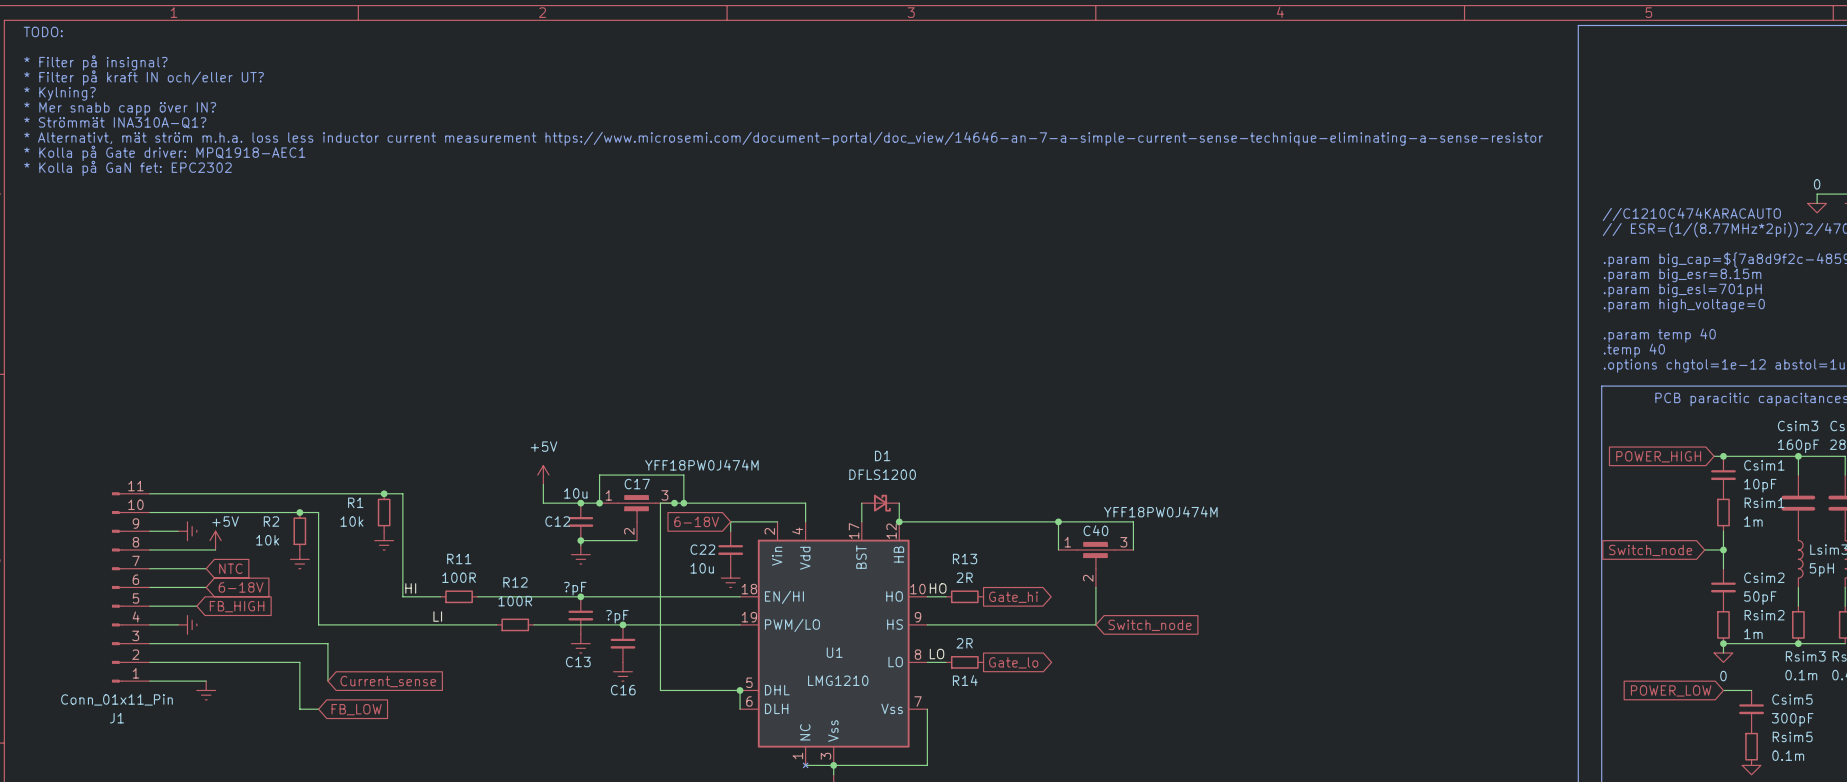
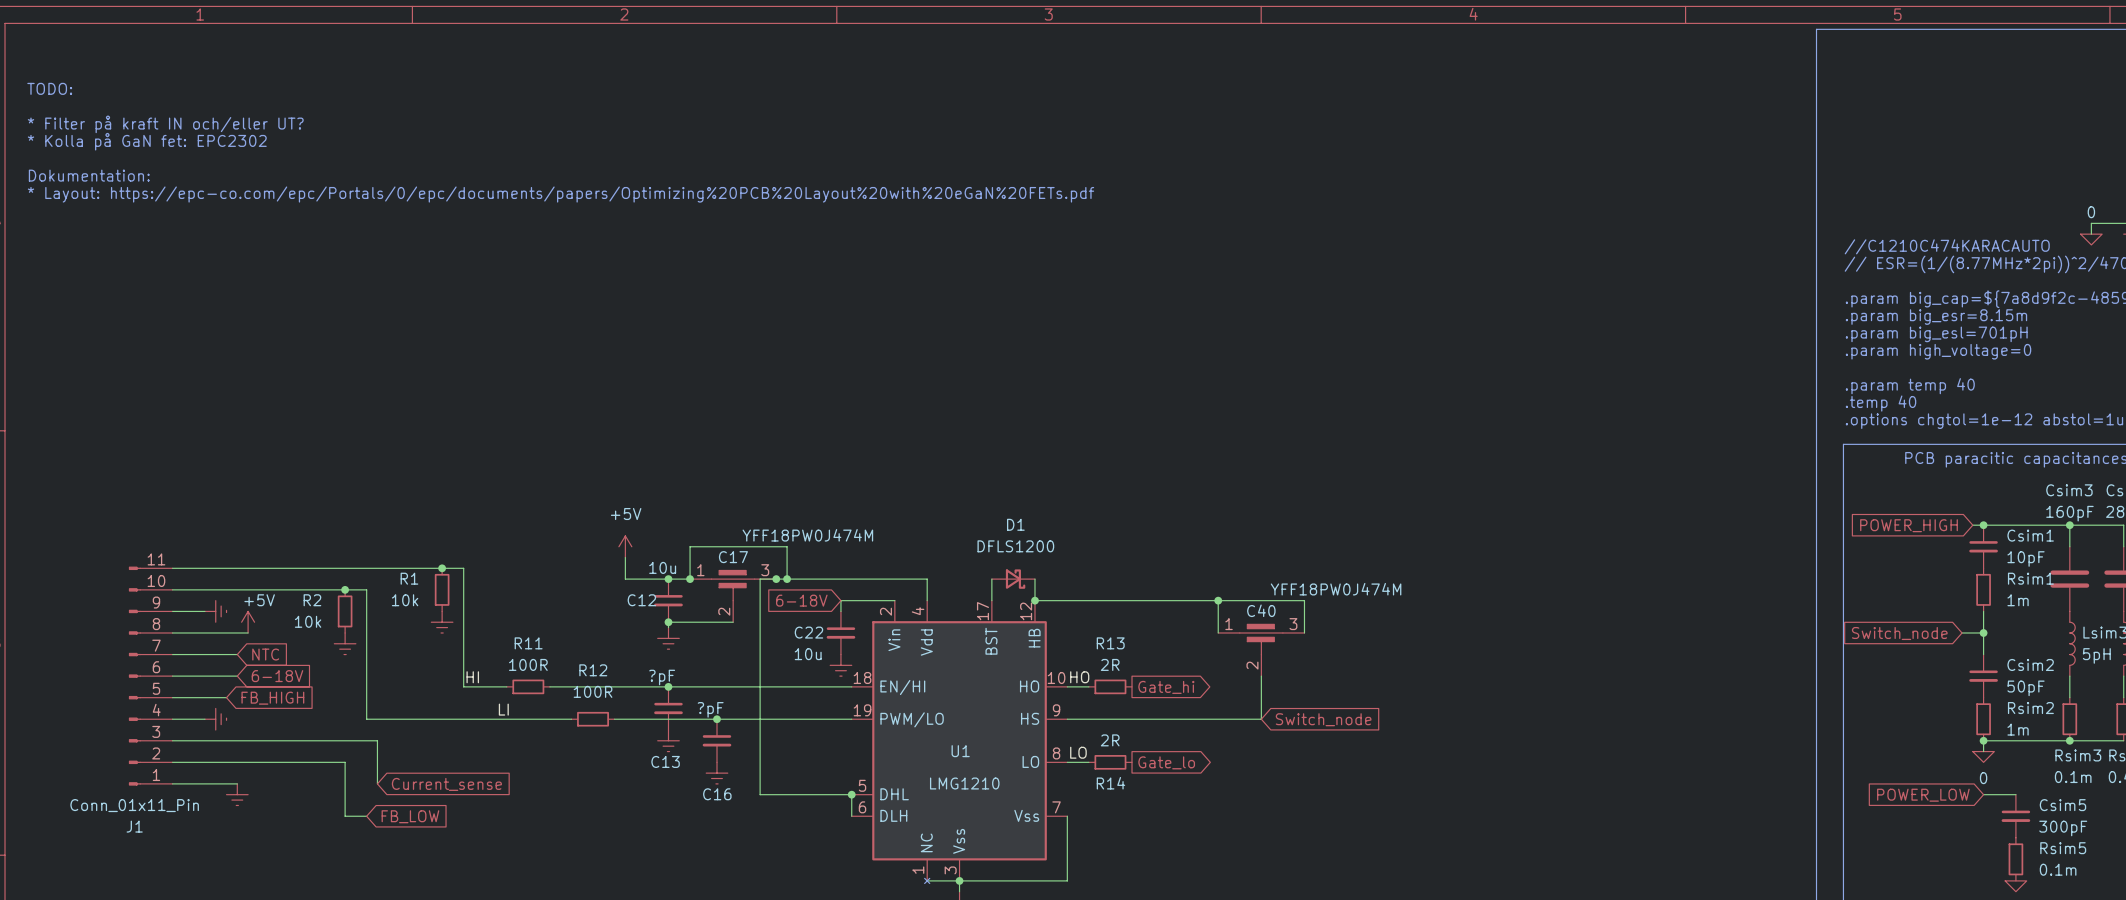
text: TODO: (43, 31) -> none
text: * Filter på insignal? (95, 62) -> none
text: * Filter på kraft IN och/eller UT? (144, 77) -> TODO: (49, 88)
text: * Kylning? (59, 93) -> none
text: * Mer snabb capp över IN? (120, 108) -> * Filter på kraft IN och/eller UT? (165, 124)
text: * Strömmät INA310A-Q1? (115, 122) -> * Kolla på GaN fet: EPC2302 (147, 141)
text: * Alternativt, mät ström m.h.a. loss less inductor current measurement https://www.microsemi.com/document-portal/doc_view/14646-an-7-a-simple-current-sense-technique-eliminating-a-sense-resistor (783, 138) -> none
text: * Kolla på Gate driver: MPQ1918-AEC1 (164, 153) -> Dokumentation: (89, 175)
text: * Kolla på GaN fet: EPC2302 (127, 168) -> * Layout: https://epc-co.com/epc/Portals/0/epc/documents/papers/Optimizing%20PCB%20Layout%20with%20eGaN%20FETs.pdf (560, 194)

